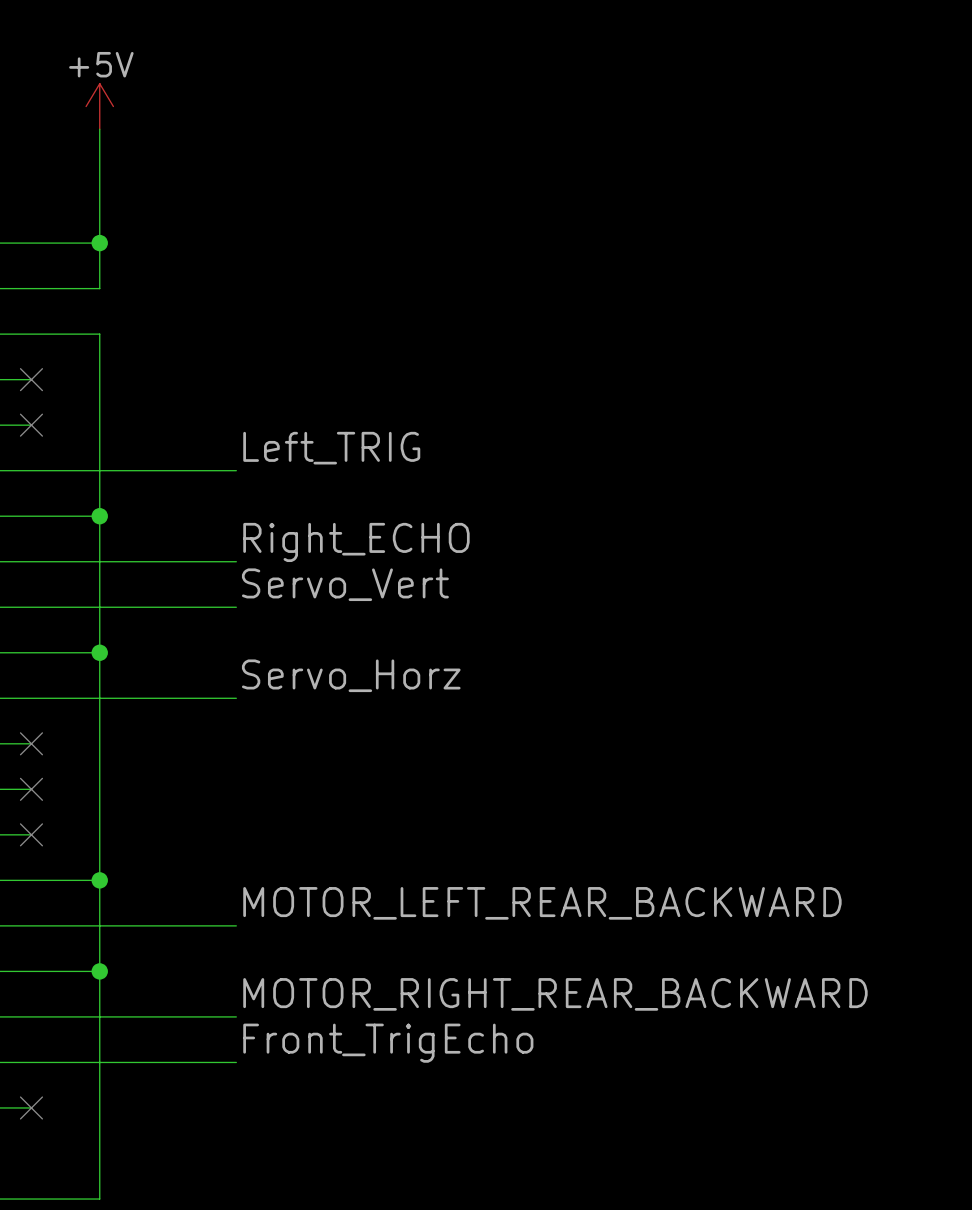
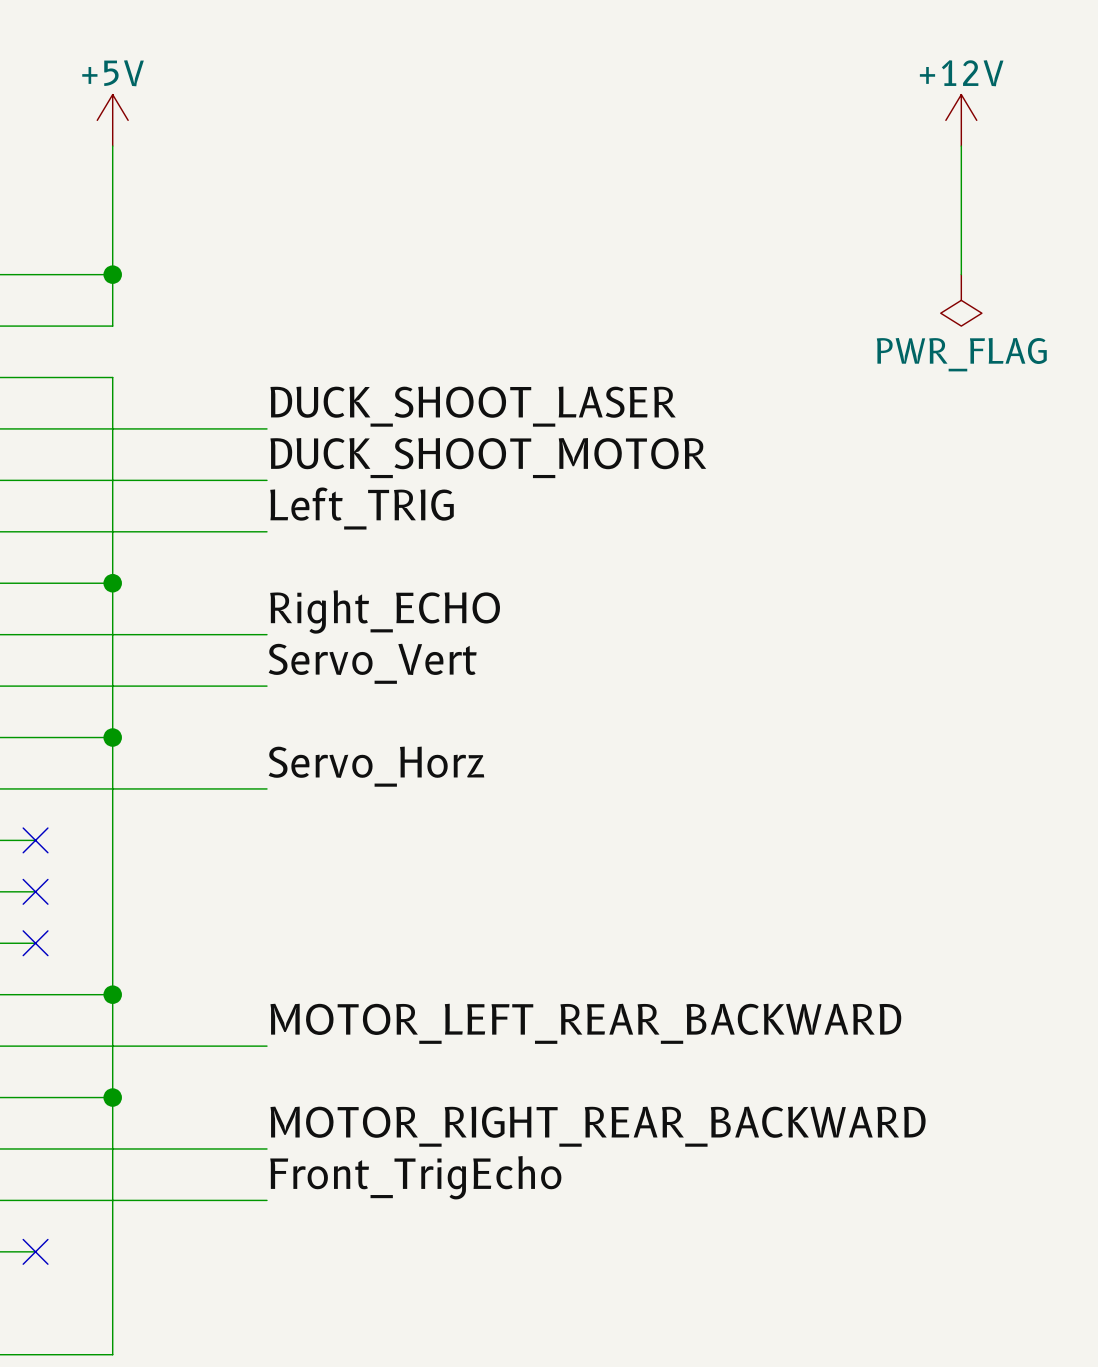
power symbol: none -> +12V (961, 120)
wire: none -> (961, 146) (961, 274)
power symbol: none -> PWR_FLAG (961, 300)
label: none -> DUCK_SHOOT_LASER (473, 406)
wire: none -> (35, 428) (266, 428)
no-connect mark: (31, 379) -> none
label: none -> DUCK_SHOOT_MOTOR (488, 458)
wire: none -> (35, 480) (266, 480)
no-connect mark: (31, 425) -> none

